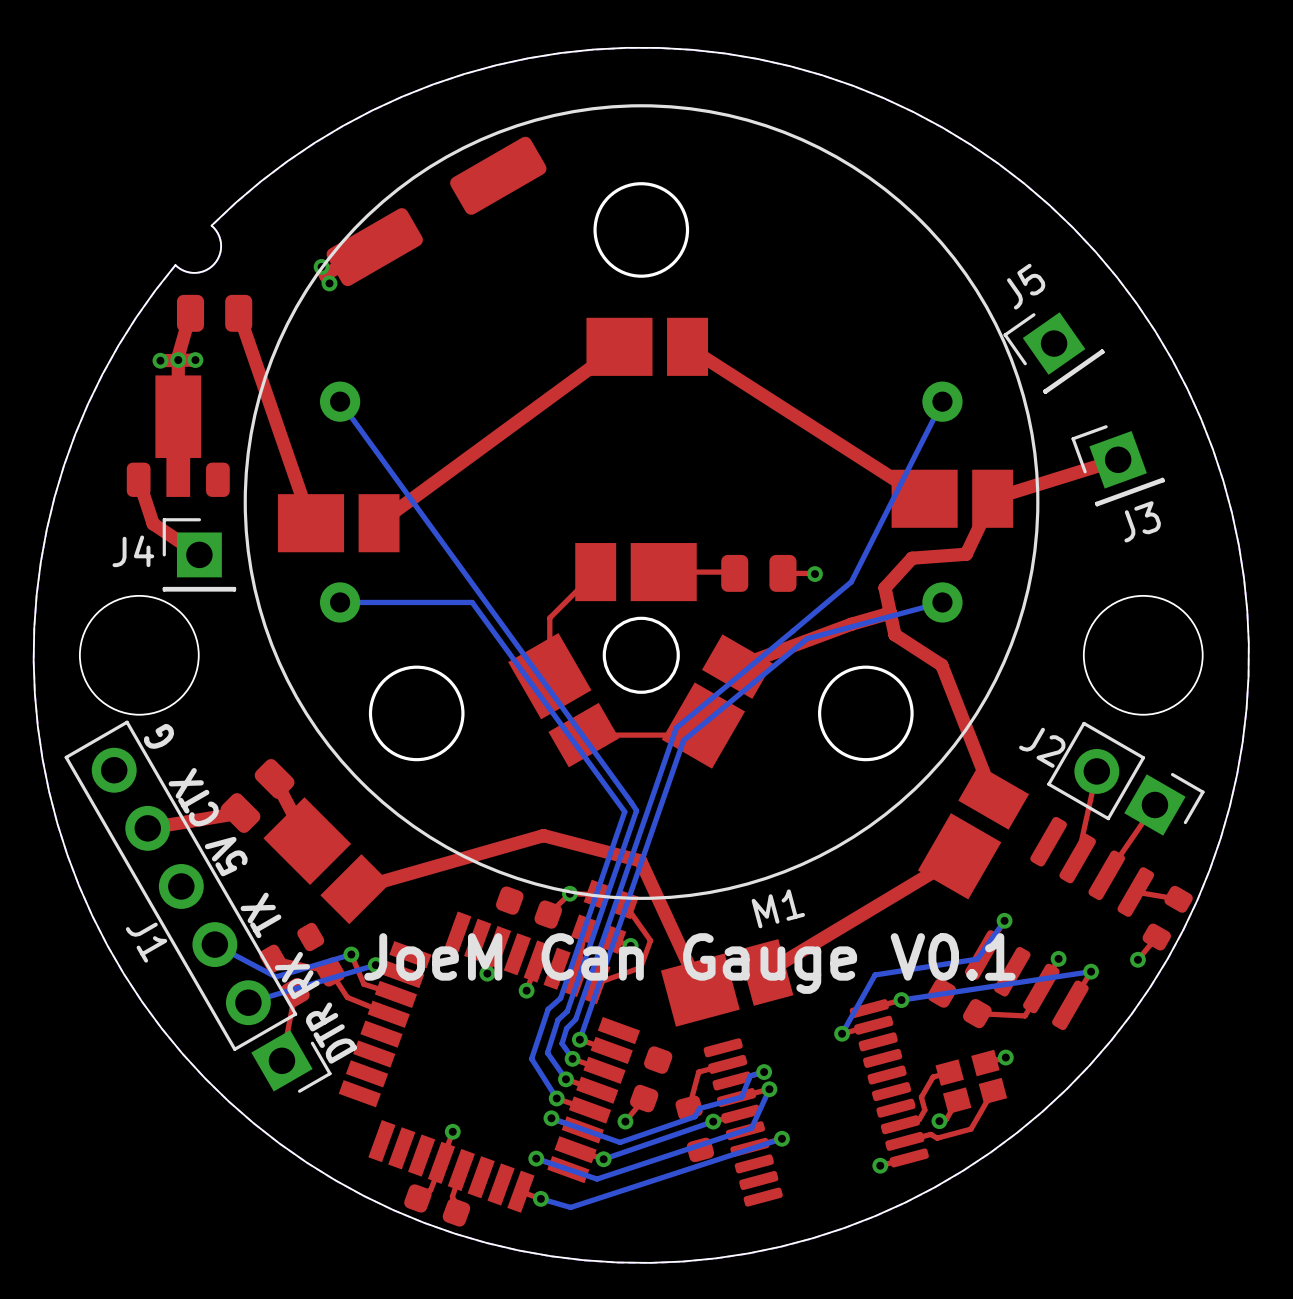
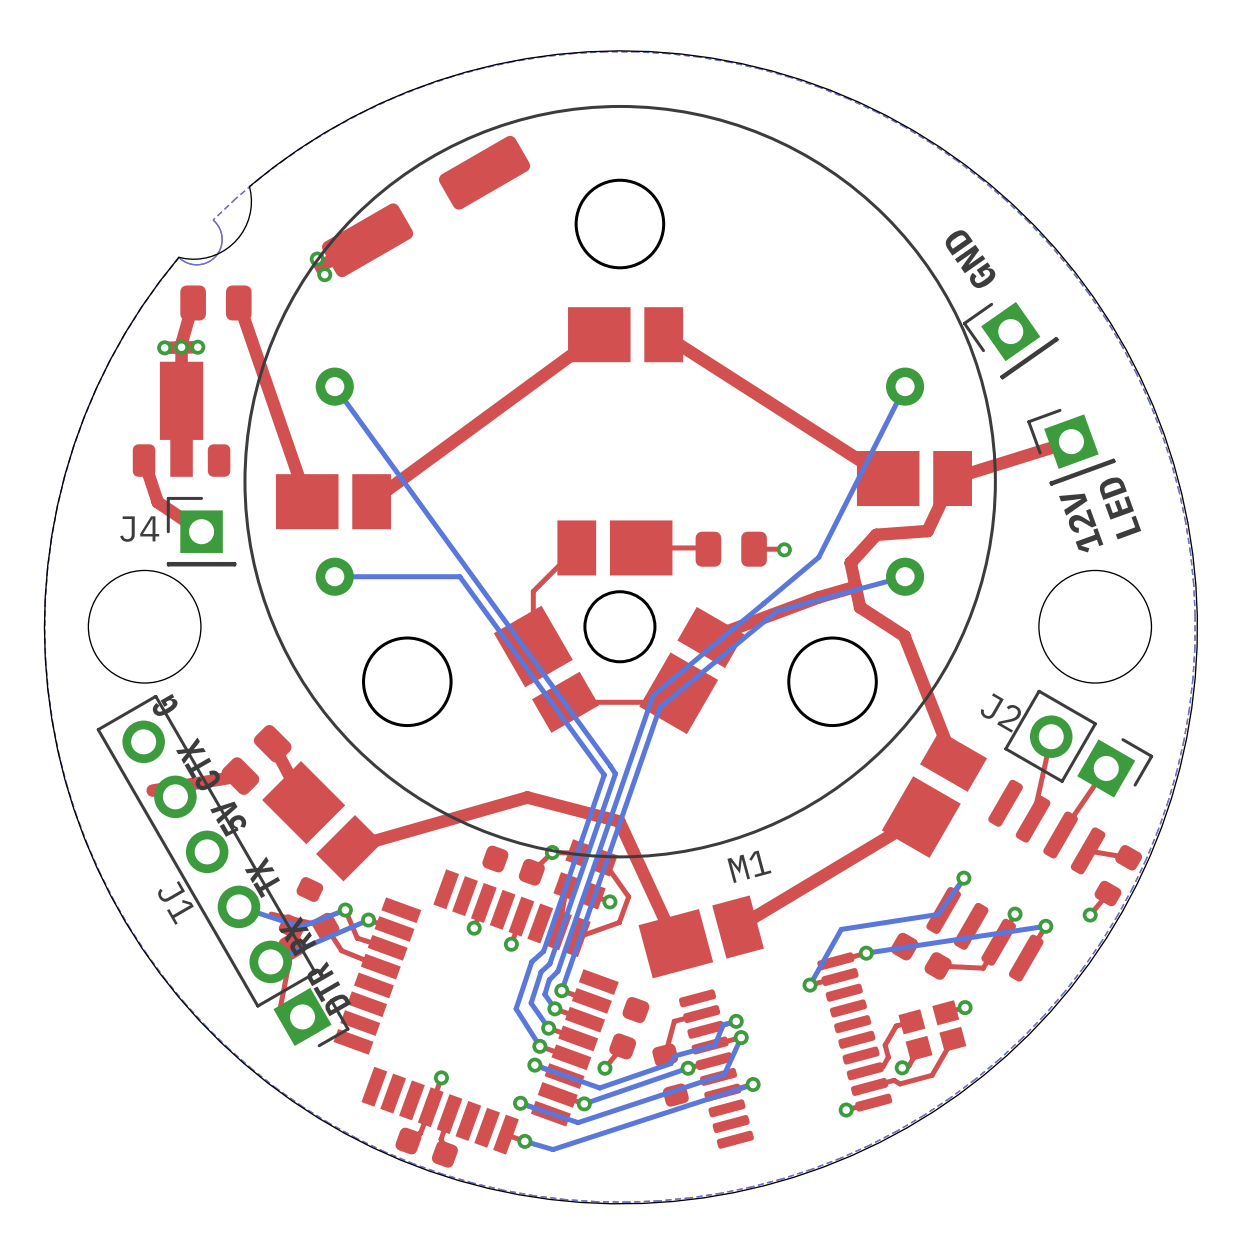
board edge: (211, 225) (260, 181) (314, 143) (371, 110) (432, 84) (495, 65) (560, 53) (593, 49) (659, 47) (692, 49) (757, 58) (821, 75) (883, 98) (913, 112) (970, 144) (1024, 183) (1073, 227) (1095, 251) (1136, 303) (1172, 359) (1200, 418) (1223, 480) (1238, 545) (1247, 610) (1248, 676) (1242, 742) (1229, 806) (1209, 869) (1197, 900) (1183, 930) (1150, 987) (1111, 1040) (1066, 1089) (1016, 1132) (962, 1170) (905, 1202) (874, 1216) (812, 1238) (748, 1253) (682, 1261) (616, 1262) (551, 1256) (518, 1250) (454, 1233) (393, 1210) (334, 1179) (279, 1143) (228, 1101) (205, 1078) (161, 1028) (124, 974) (92, 916) (79, 886) (57, 823) (42, 759) (37, 726) (33, 660) (36, 594) (46, 529) (63, 465) (75, 434) (87, 404) (118, 345) (154, 290) (175, 265) (186, 271) (196, 272) (206, 270) (216, 261) (220, 252) (220, 242) (217, 233) (211, 225) -> (249, 186) (298, 149) (324, 132) (379, 103) (436, 81) (496, 64) (557, 54) (588, 51) (649, 51) (711, 57) (771, 70) (830, 90) (858, 102) (913, 130) (965, 164) (1012, 204) (1055, 248) (1093, 297) (1126, 349) (1140, 377) (1164, 434) (1181, 493) (1192, 554) (1197, 615) (1195, 677) (1191, 708) (1179, 768) (1161, 827) (1136, 884) (1106, 938) (1070, 988) (1029, 1034) (983, 1075) (933, 1111) (879, 1142) (823, 1167) (793, 1177) (764, 1185) (703, 1197) (642, 1203) (580, 1202) (519, 1194) (458, 1180) (400, 1160) (372, 1147) (318, 1117) (267, 1082) (220, 1042) (178, 997) (141, 947) (110, 894) (84, 838) (64, 779) (51, 719) (45, 658) (44, 627) (47, 565) (57, 504) (65, 474) (84, 415) (110, 359) (141, 306) (178, 257) (192, 259) (211, 256) (229, 246) (239, 237) (246, 225) (250, 213) (251, 199) (249, 186)
text: none -> GND (970, 259)
J5 name: J5 (1026, 286) -> none
J3 name: J3 (1142, 521) -> none
text: none -> LED (1120, 508)
text: none -> 12V (1081, 523)
J1 position: (198, 906) -> (223, 871)
bottom track: (214, 944) (276, 976) (351, 954) -> (238, 906) (300, 926) (345, 910)
part rotation: 0° (291, 947) -> 34.6° counterclockwise (300, 908)
text: JoeM Can Gauge V0.1 (689, 963) -> none
bottom track: (375, 965) (248, 1002) -> (368, 920) (270, 961)

